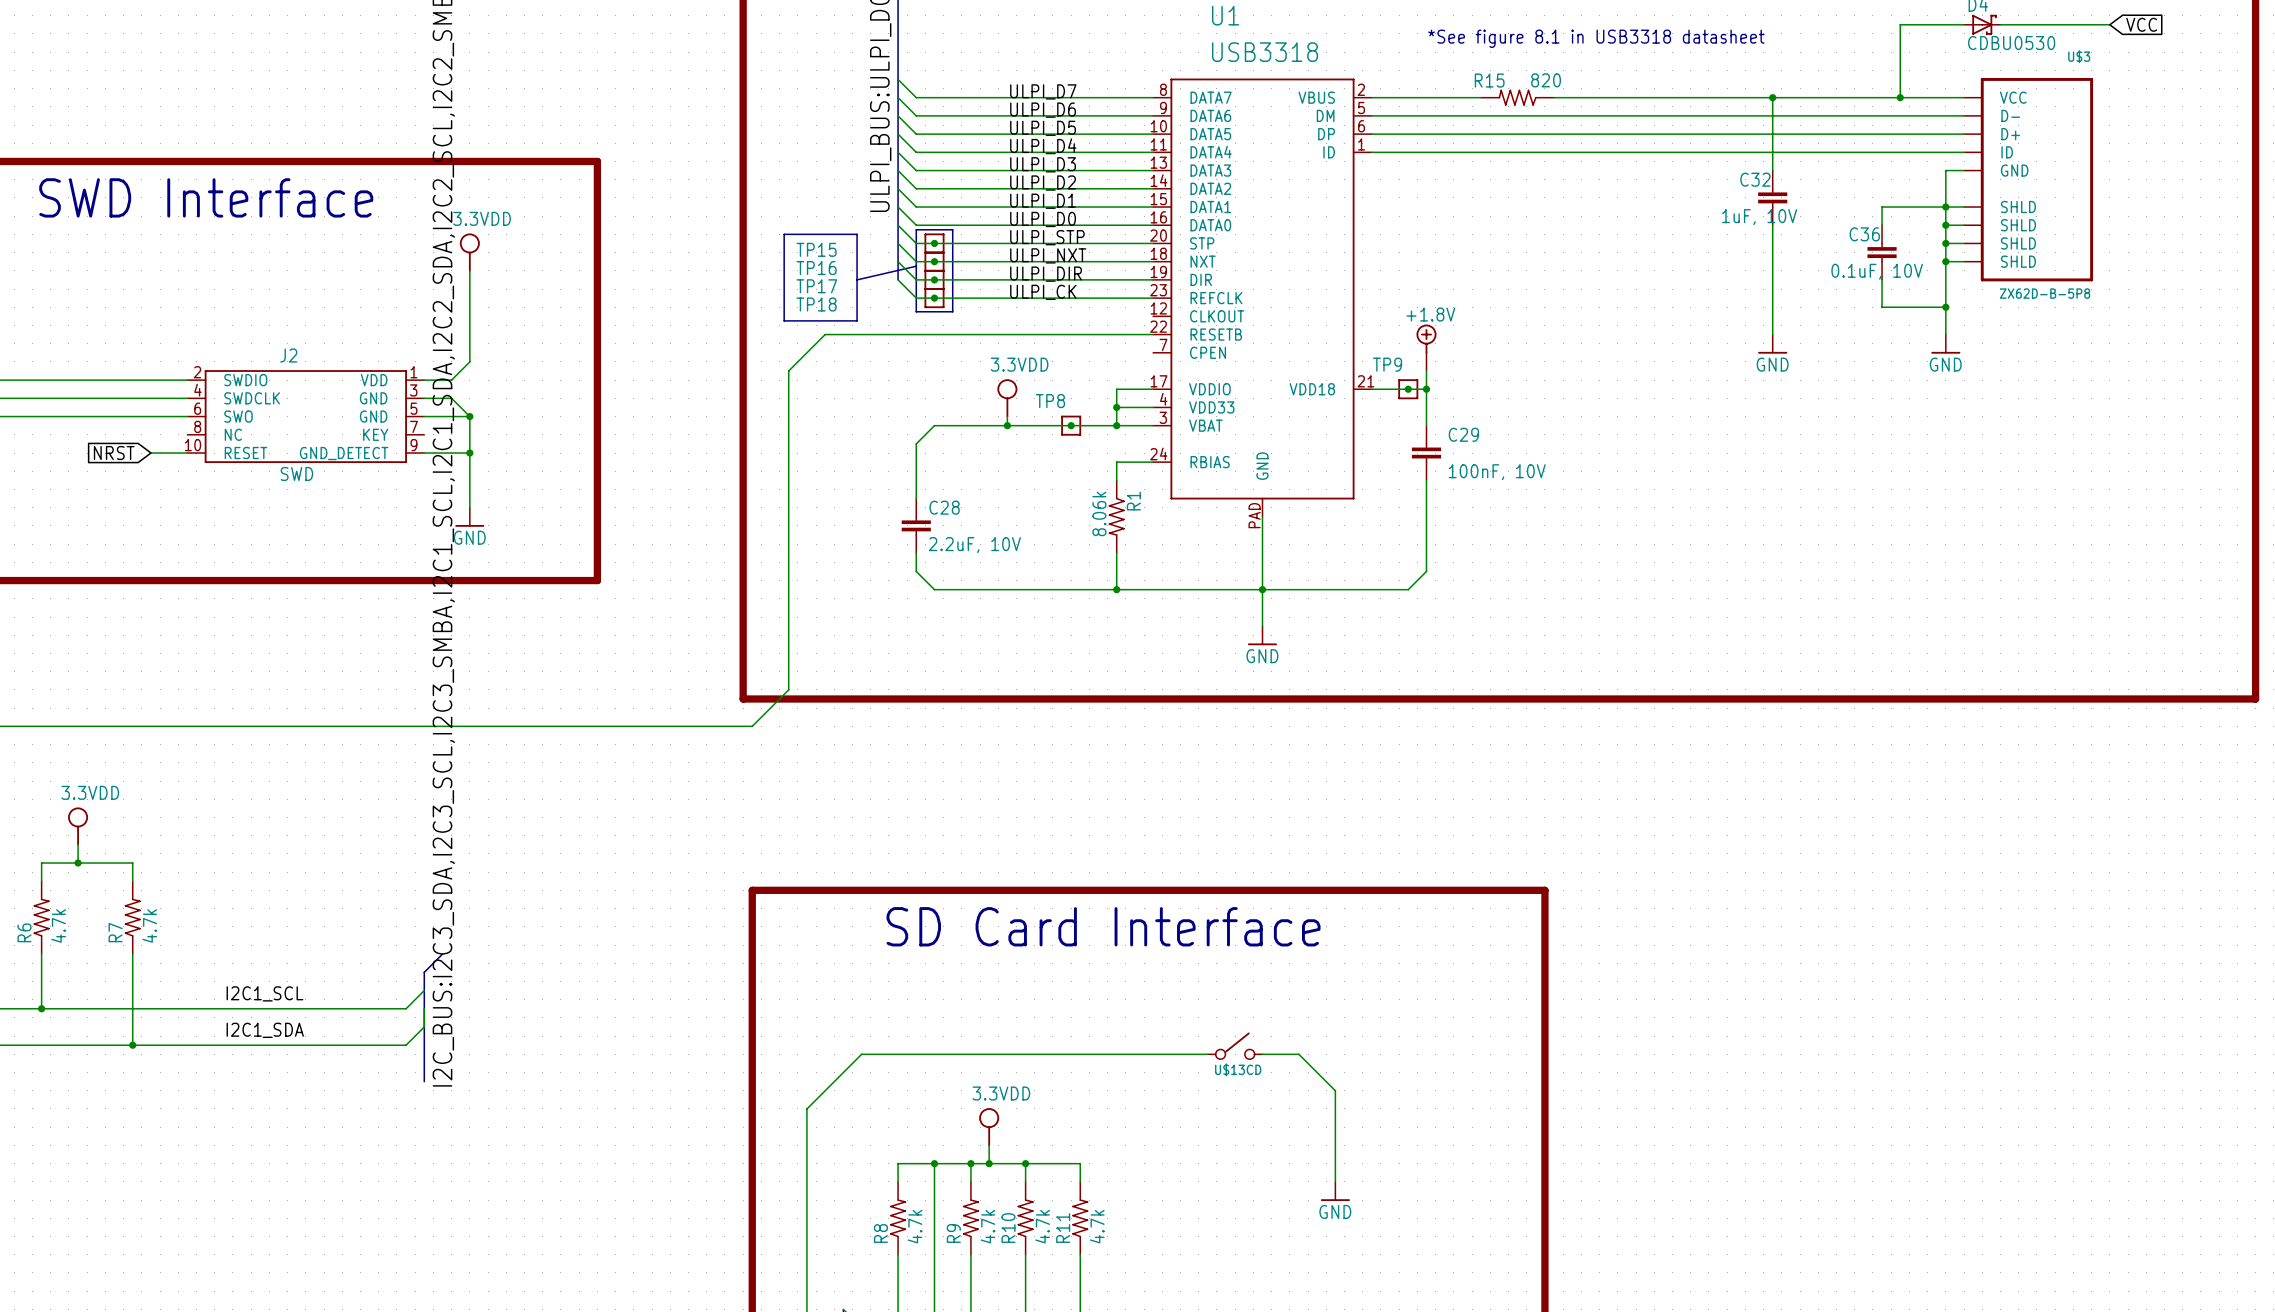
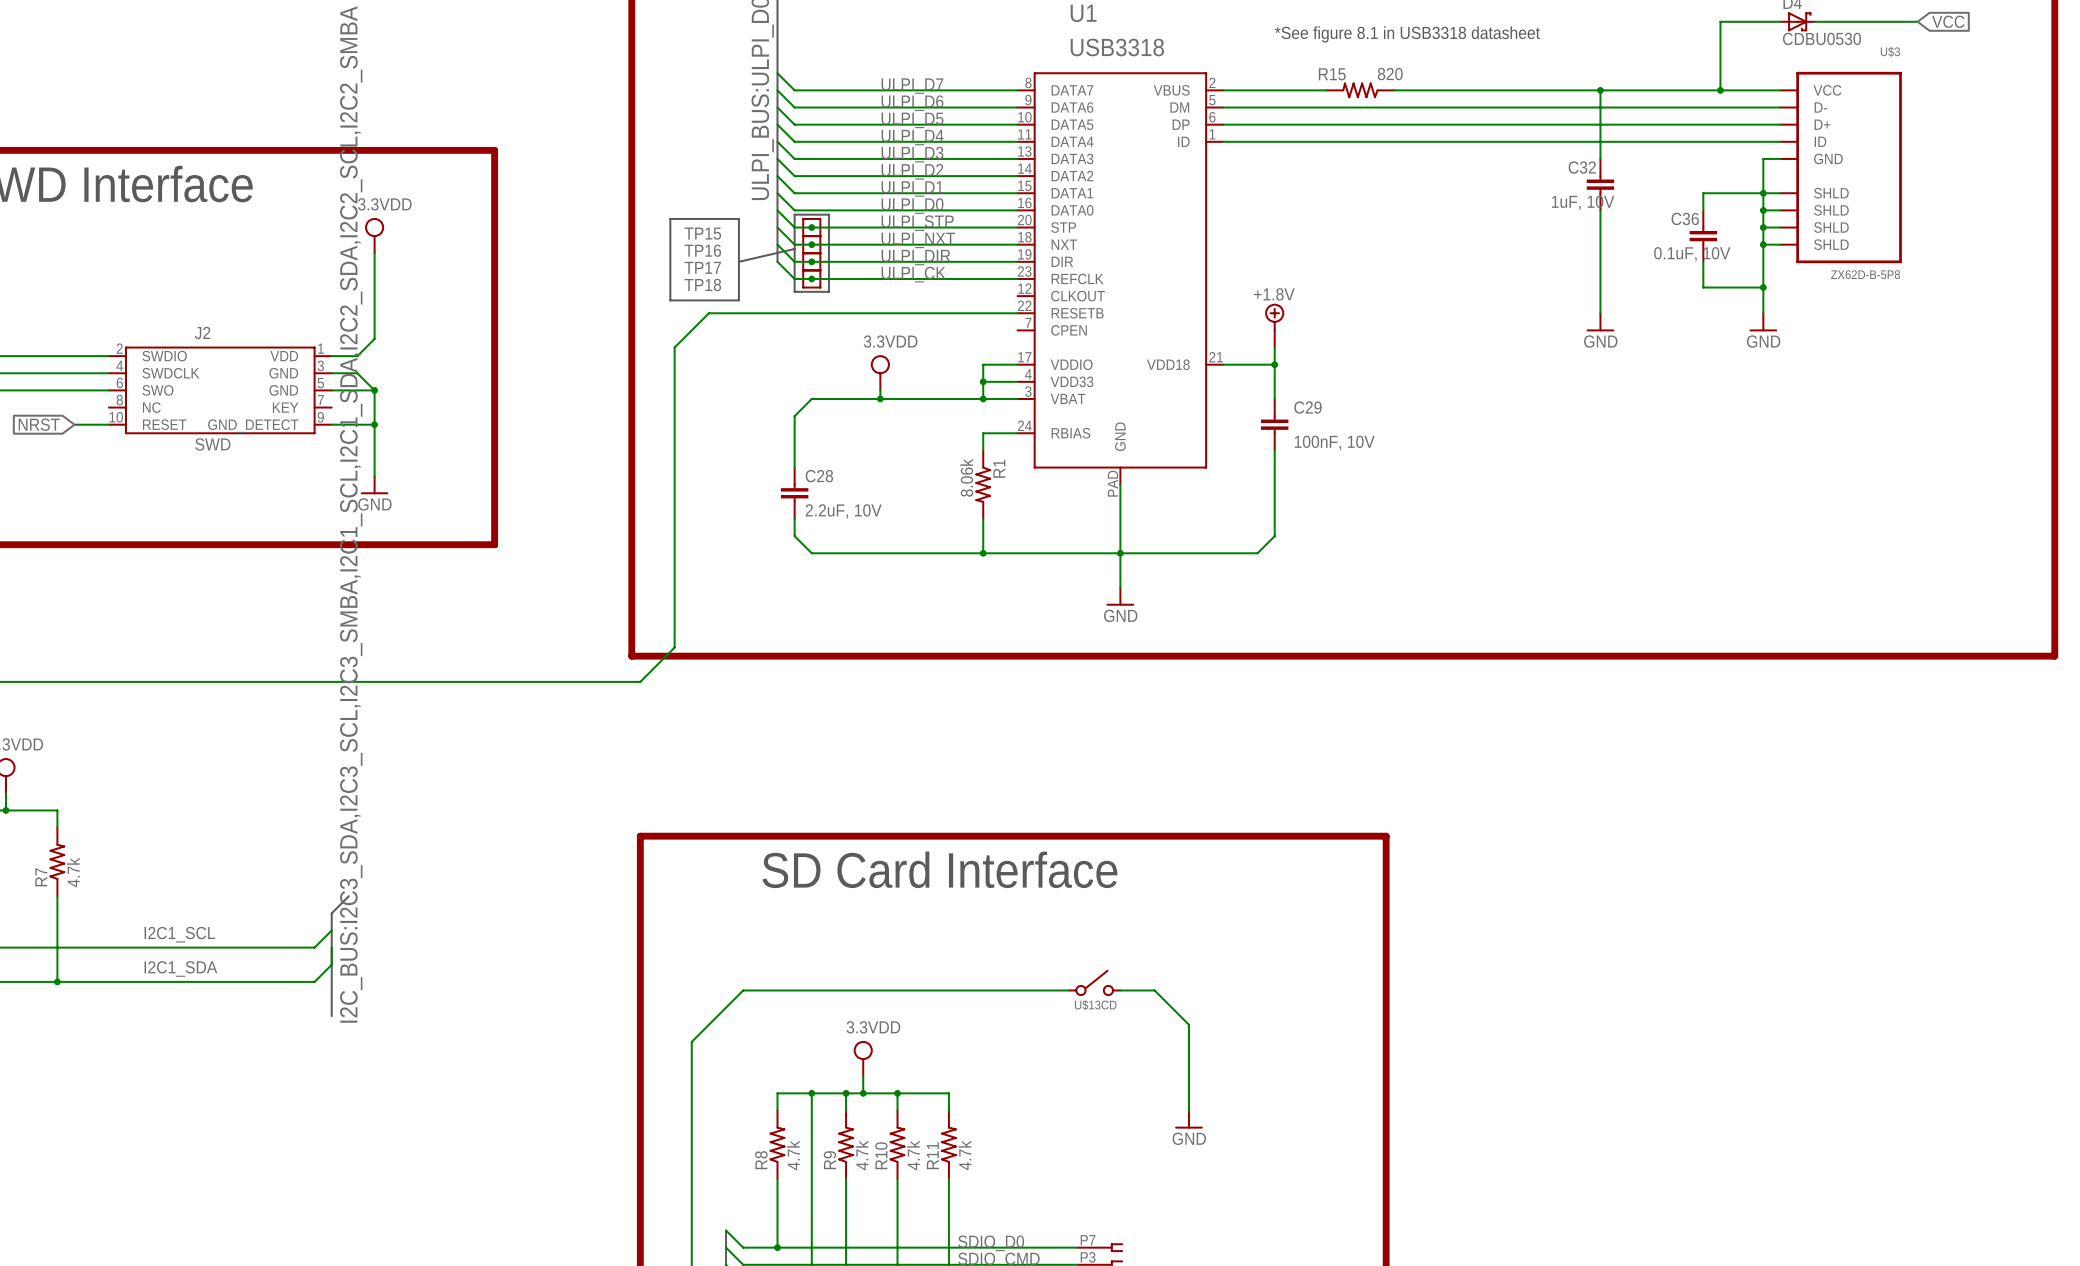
TP9: (1408, 389) -> none
junction: (1408, 389) -> none
TP8: (1071, 425) -> none
junction: (1071, 425) -> none

